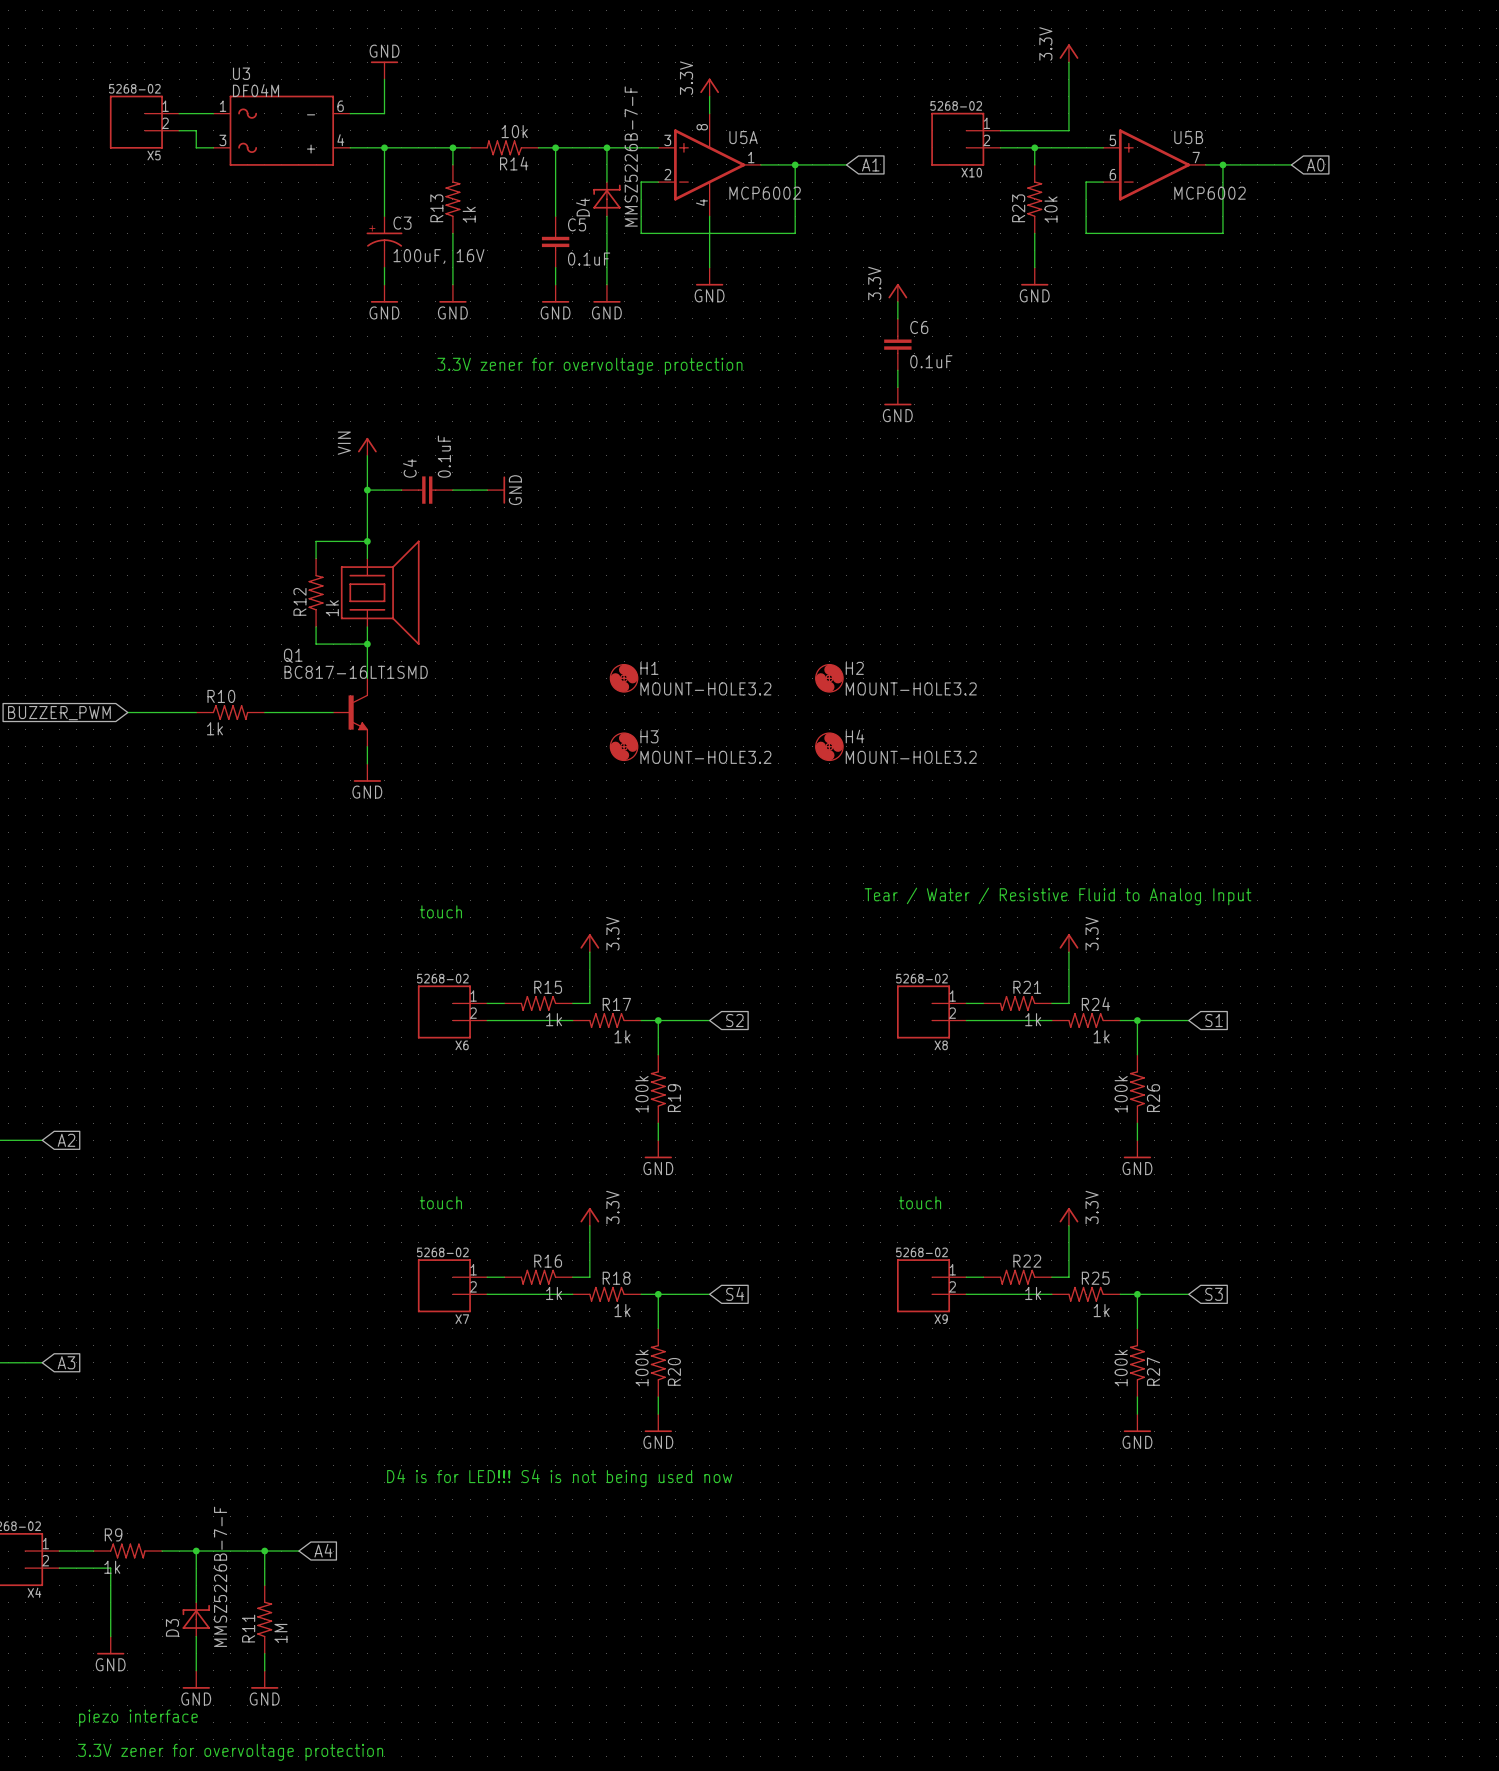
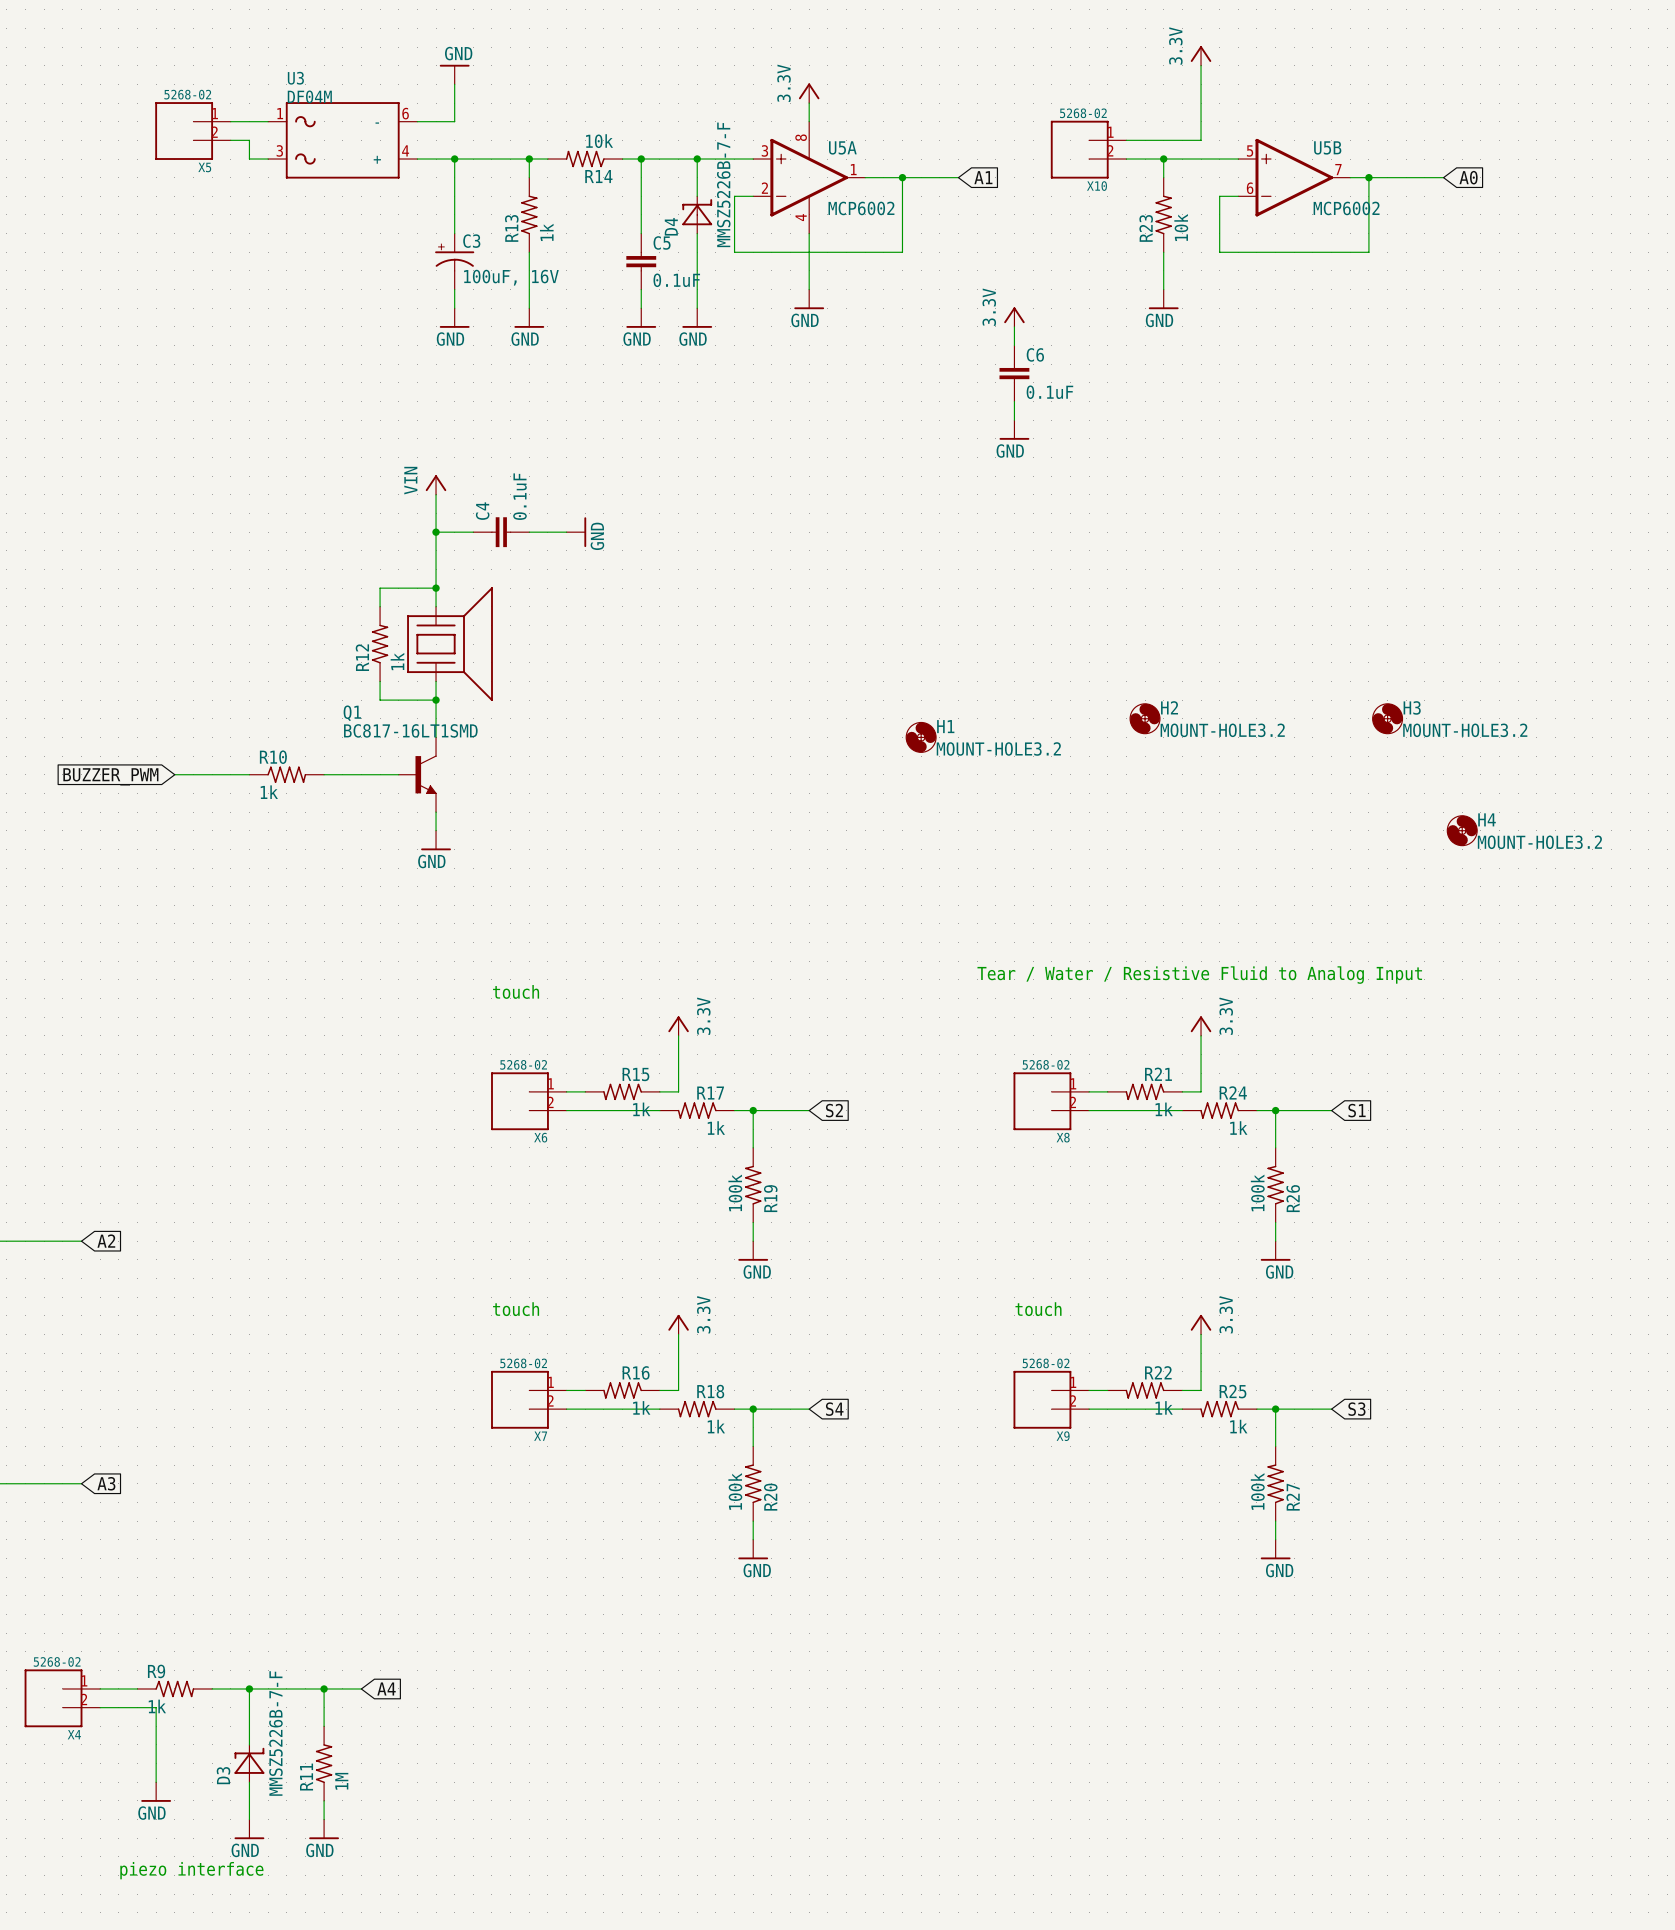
text: 3.3V zener for overvoltage protection (589, 366) -> none
H1 position: (624, 678) -> (921, 737)
H2 position: (829, 678) -> (1145, 718)
H3 position: (624, 746) -> (1387, 718)
H4 position: (829, 746) -> (1462, 830)
text: D4 is for LED!!! S4 is not being used now (559, 1478) -> none
text: 3.3V zener for overvoltage protection (230, 1752) -> none

